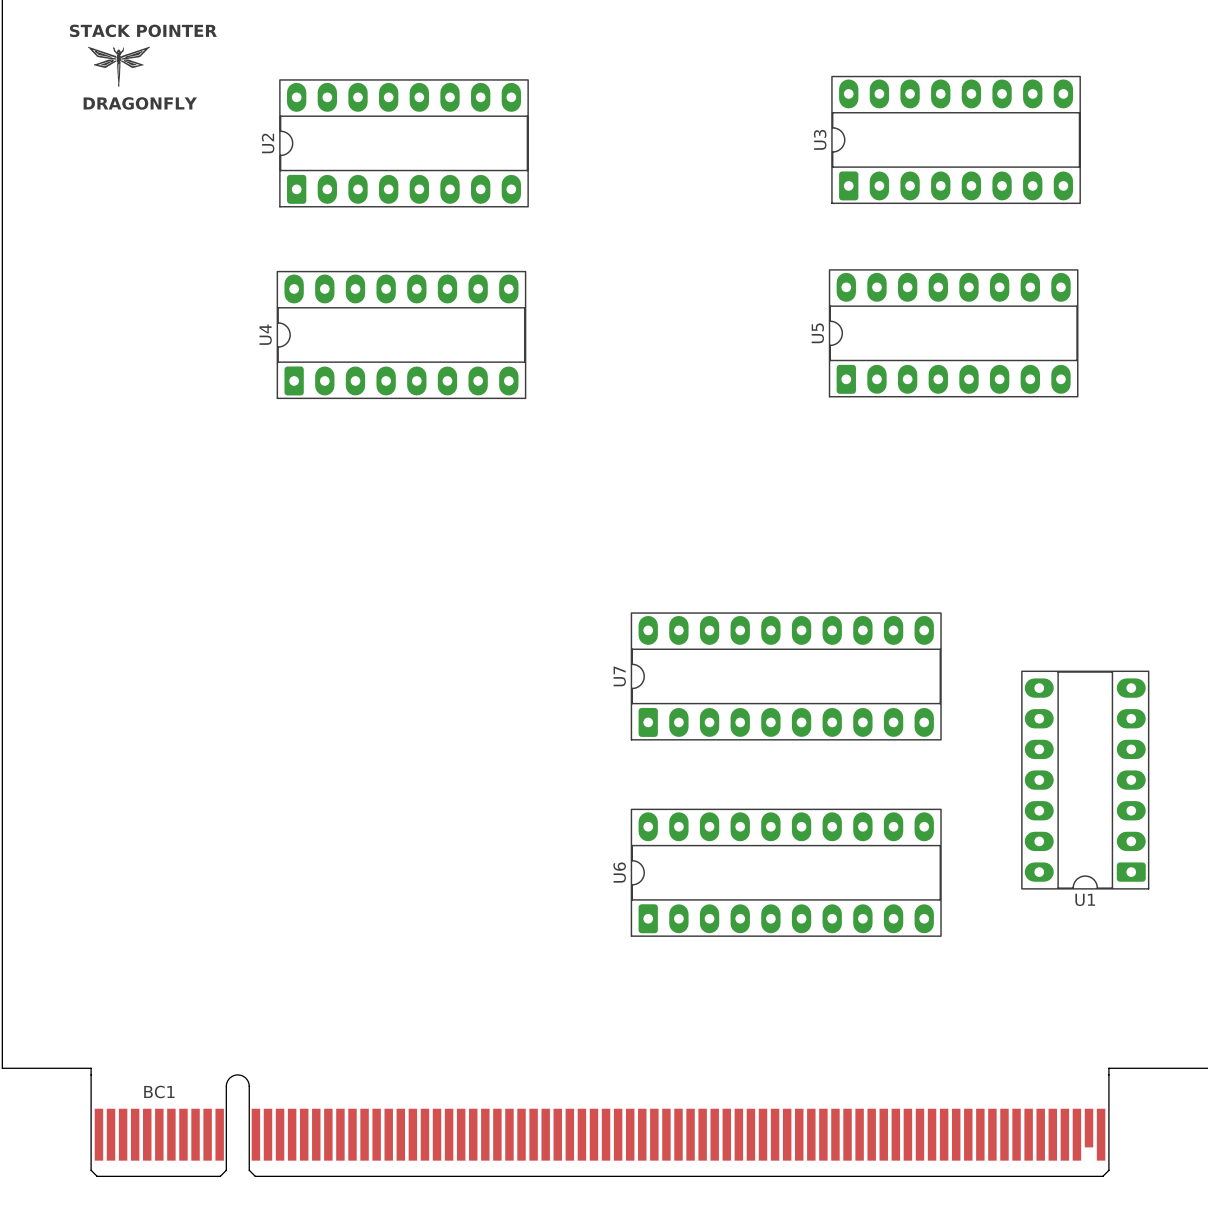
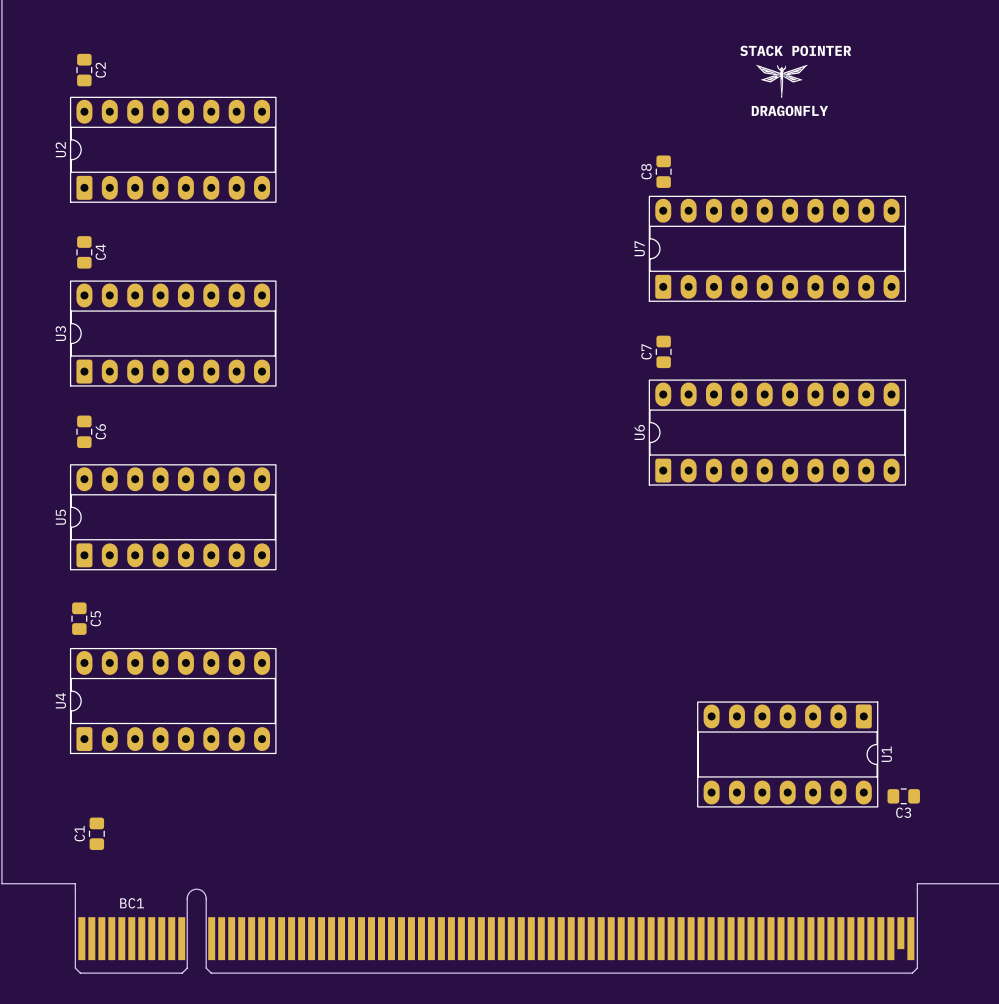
text: STACK POINTER (143, 30) -> none
drawing: [87, 46, 150, 88] -> none
text: none -> STACK POINTER (795, 50)
drawing: none -> [756, 64, 808, 99]
C2: none -> (84, 70)
text: DRAGONFLY (140, 103) -> none
text: none -> DRAGONFLY (789, 110)
U3 position: (956, 139) -> (173, 333)
U2 position: (404, 143) -> (173, 149)
C8: none -> (663, 171)
C4: none -> (84, 252)
U5 position: (953, 333) -> (173, 517)
U4 position: (401, 334) -> (173, 701)
C7: none -> (663, 351)
C6: none -> (84, 431)
U7 position: (786, 676) -> (777, 248)
C5: none -> (79, 618)
U1 rotation: 0° (1085, 780) -> 90° counterclockwise (787, 754)
U1 position: (1085, 780) -> (787, 754)
U6 position: (786, 872) -> (777, 432)
C3: none -> (903, 796)
C1: none -> (96, 833)

